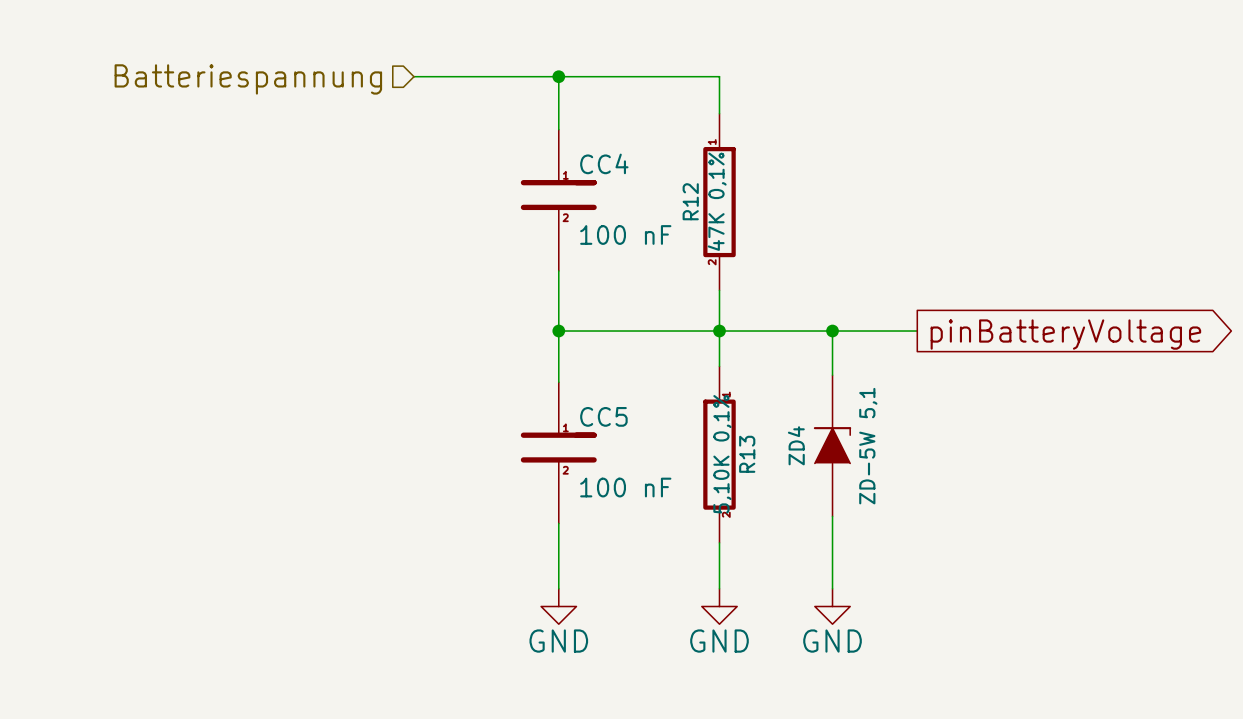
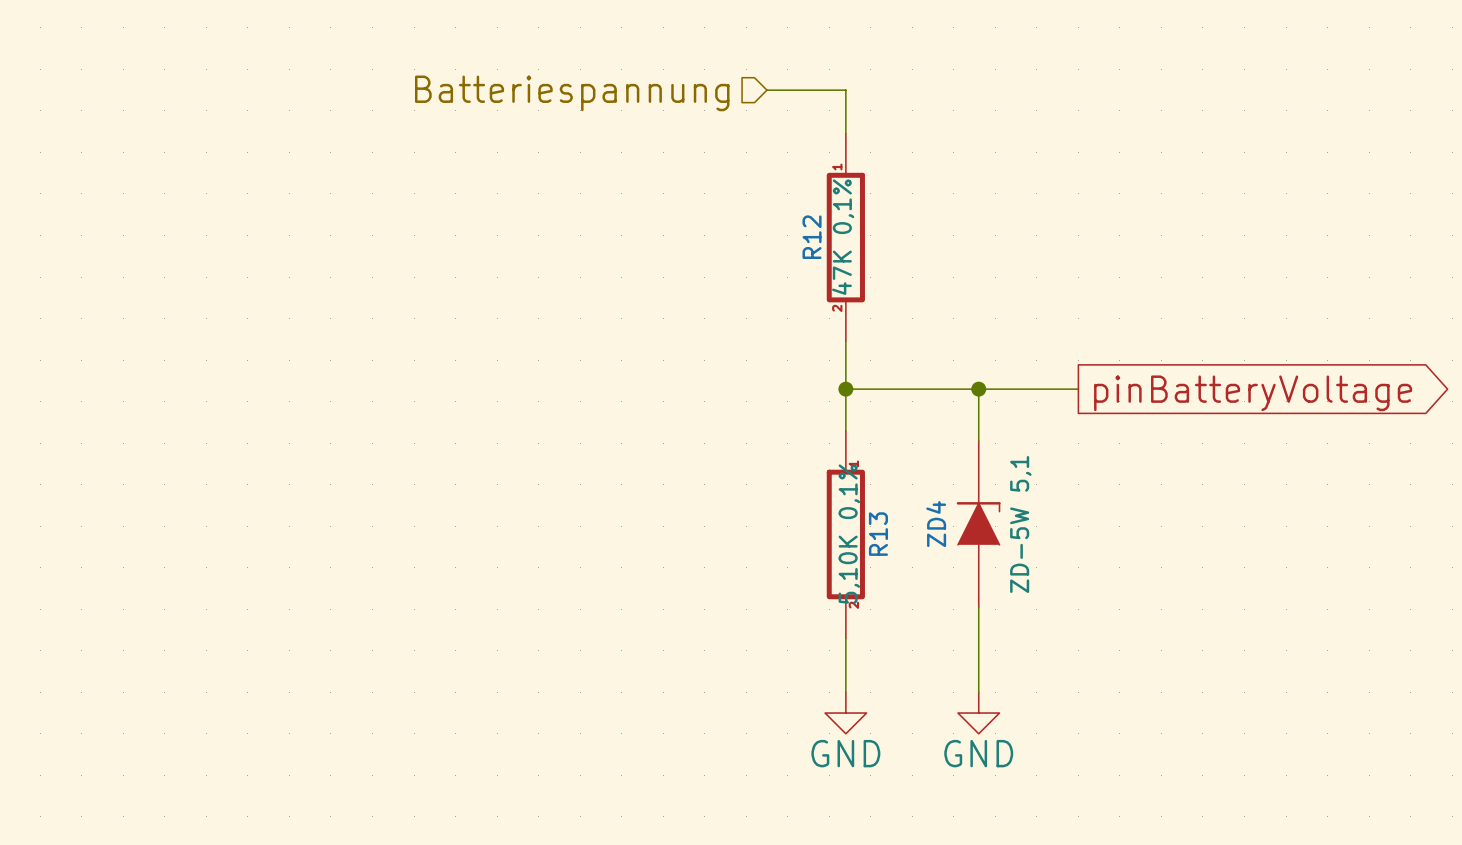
wire: (413, 76) (652, 76) -> none
wire: (558, 76) (558, 129) -> none
junction: (558, 76) -> none
hierarchical label position: Batteriespannung (248, 79) -> Batteriespannung (572, 93)
CC4: 100 nF (558, 200) -> none
wire: (558, 270) (558, 382) -> none
wire: (558, 331) (719, 331) -> none
junction: (558, 331) -> none
CC5: 100 nF (558, 452) -> none
wire: (558, 523) (558, 588) -> none
power symbol: GND (558, 606) -> none

